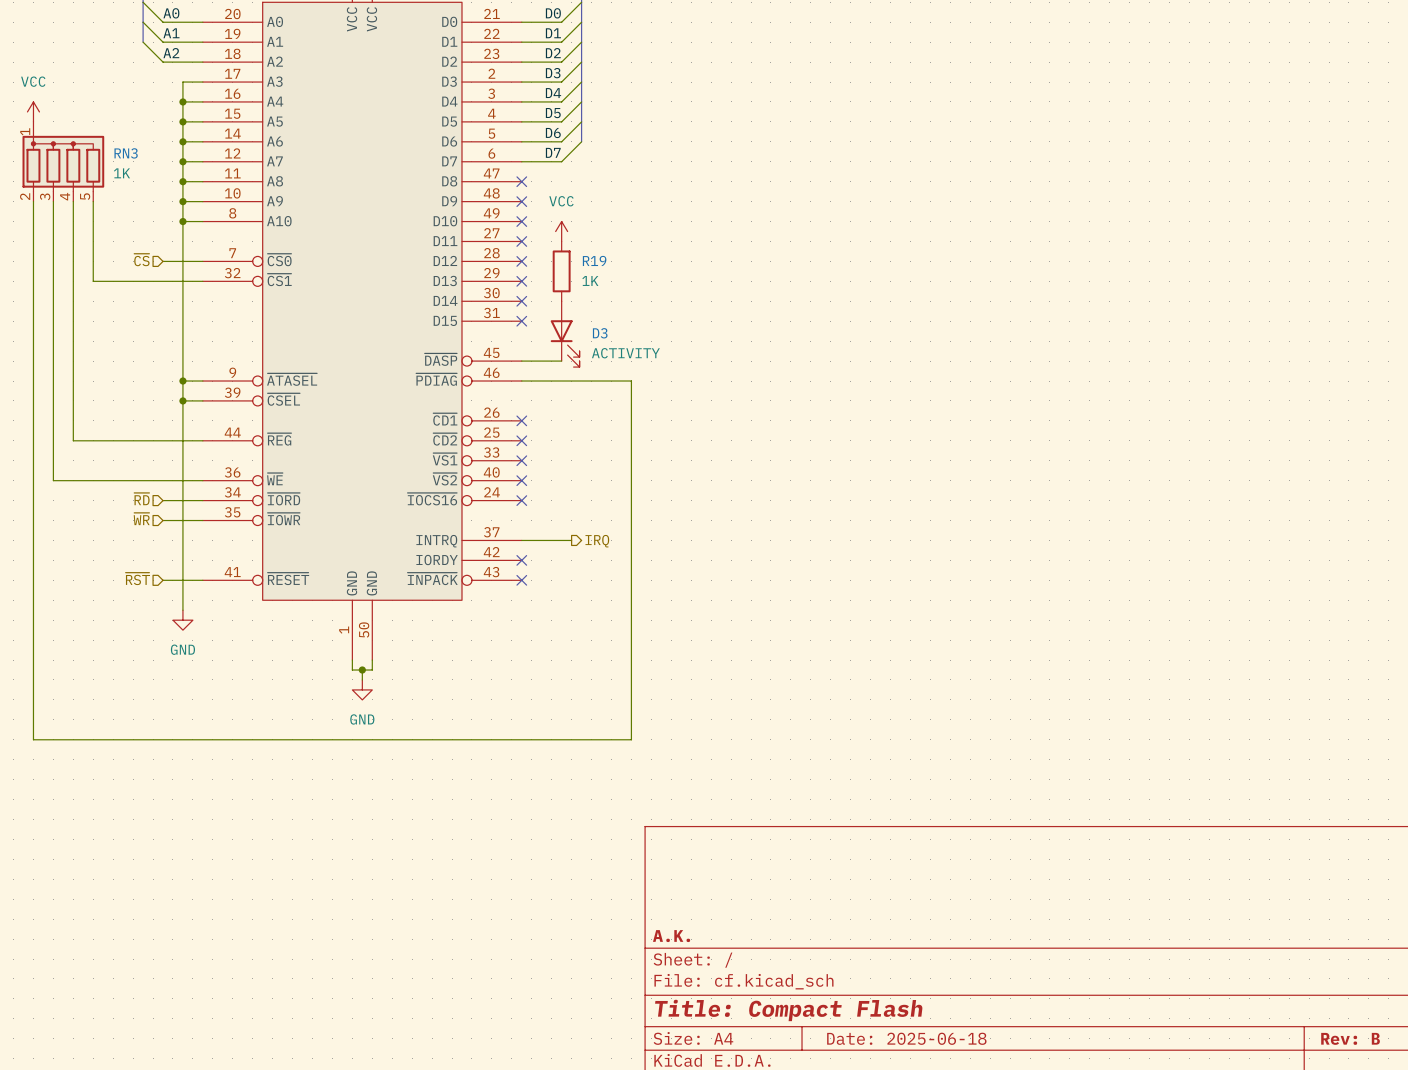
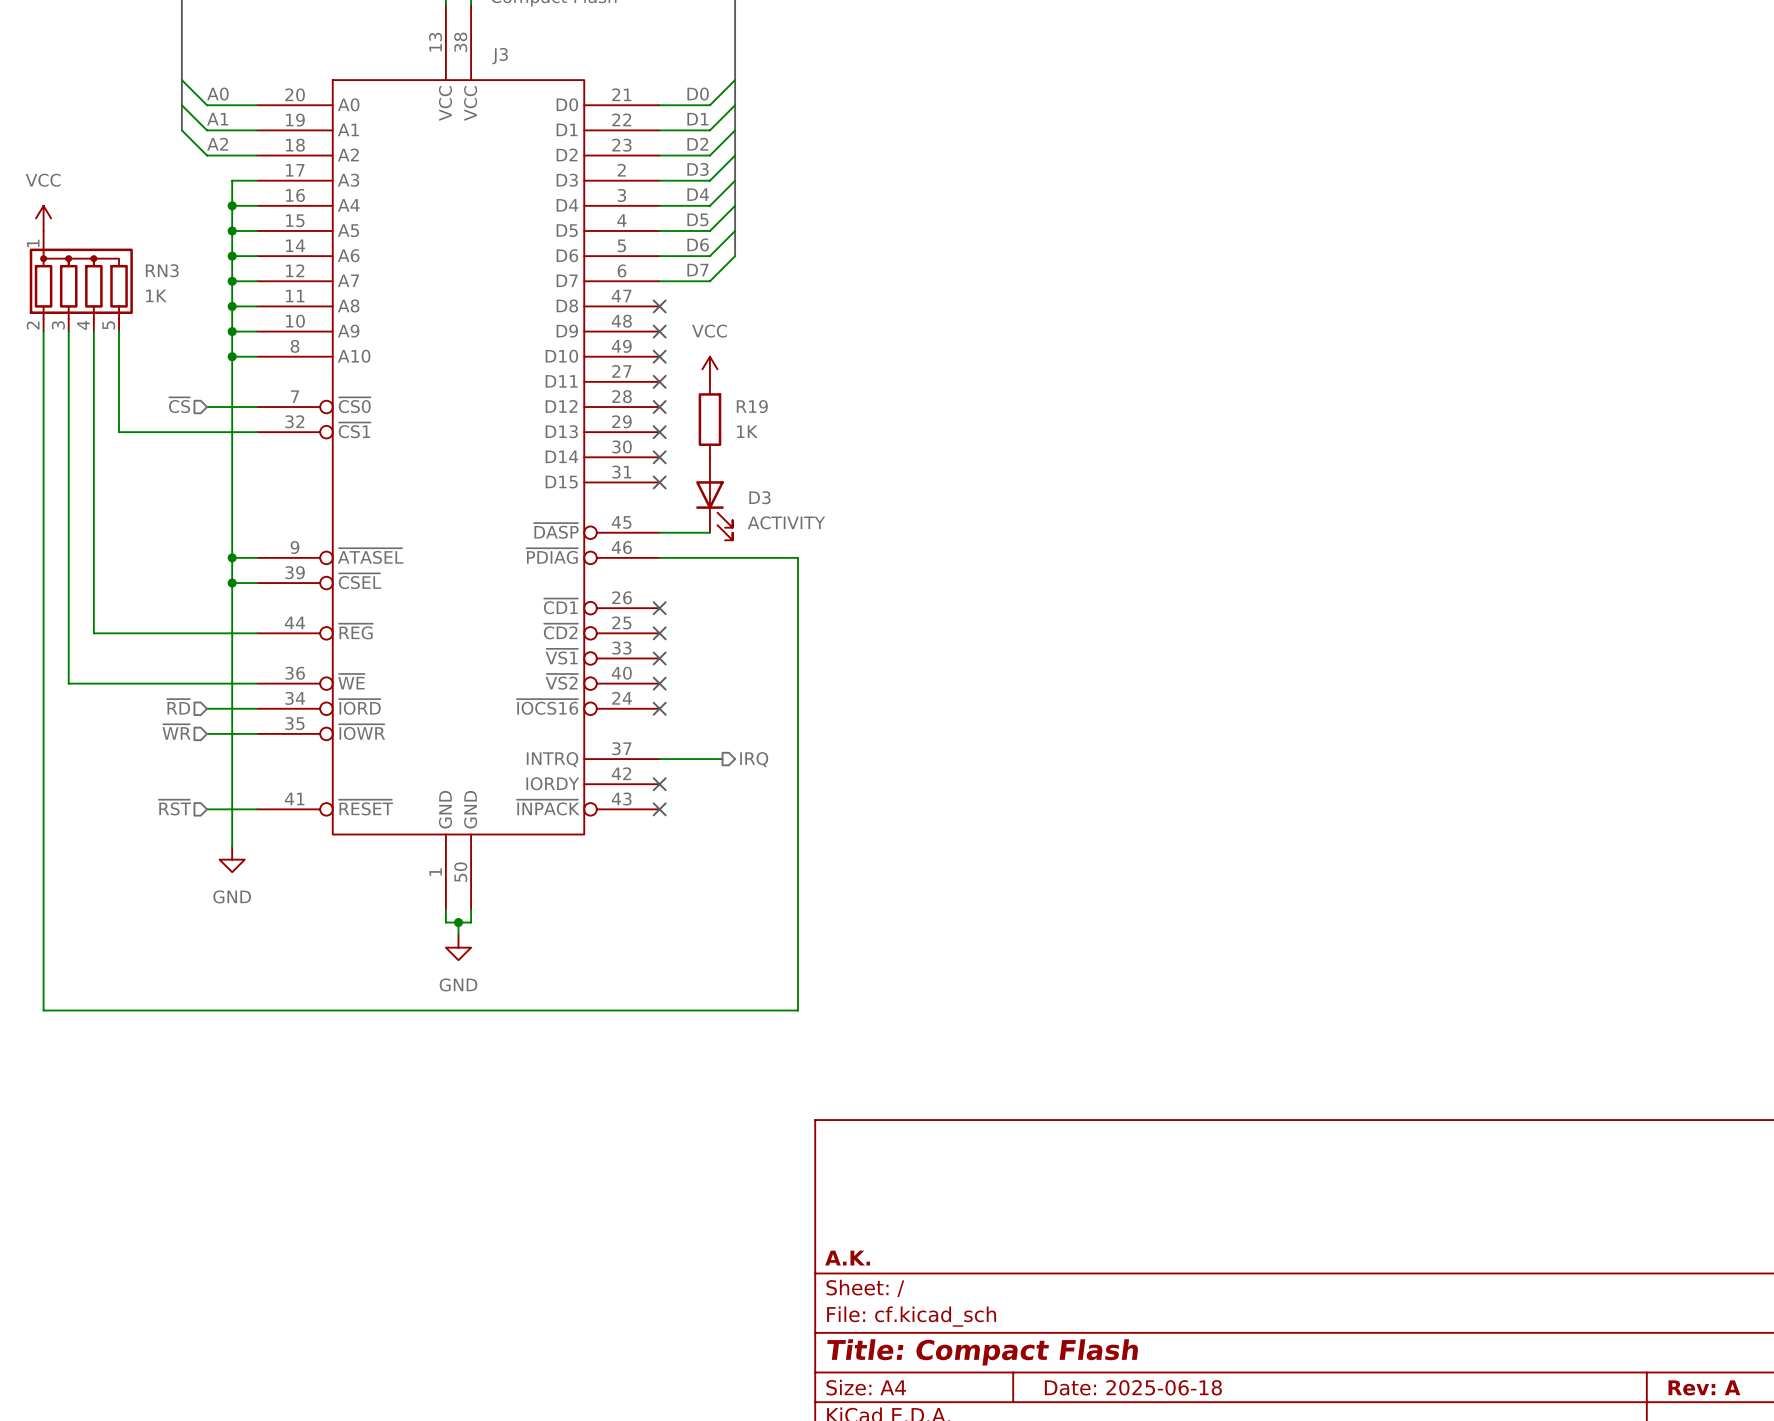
title block: Rev: B (1350, 1038) -> Rev: A (1704, 1387)

